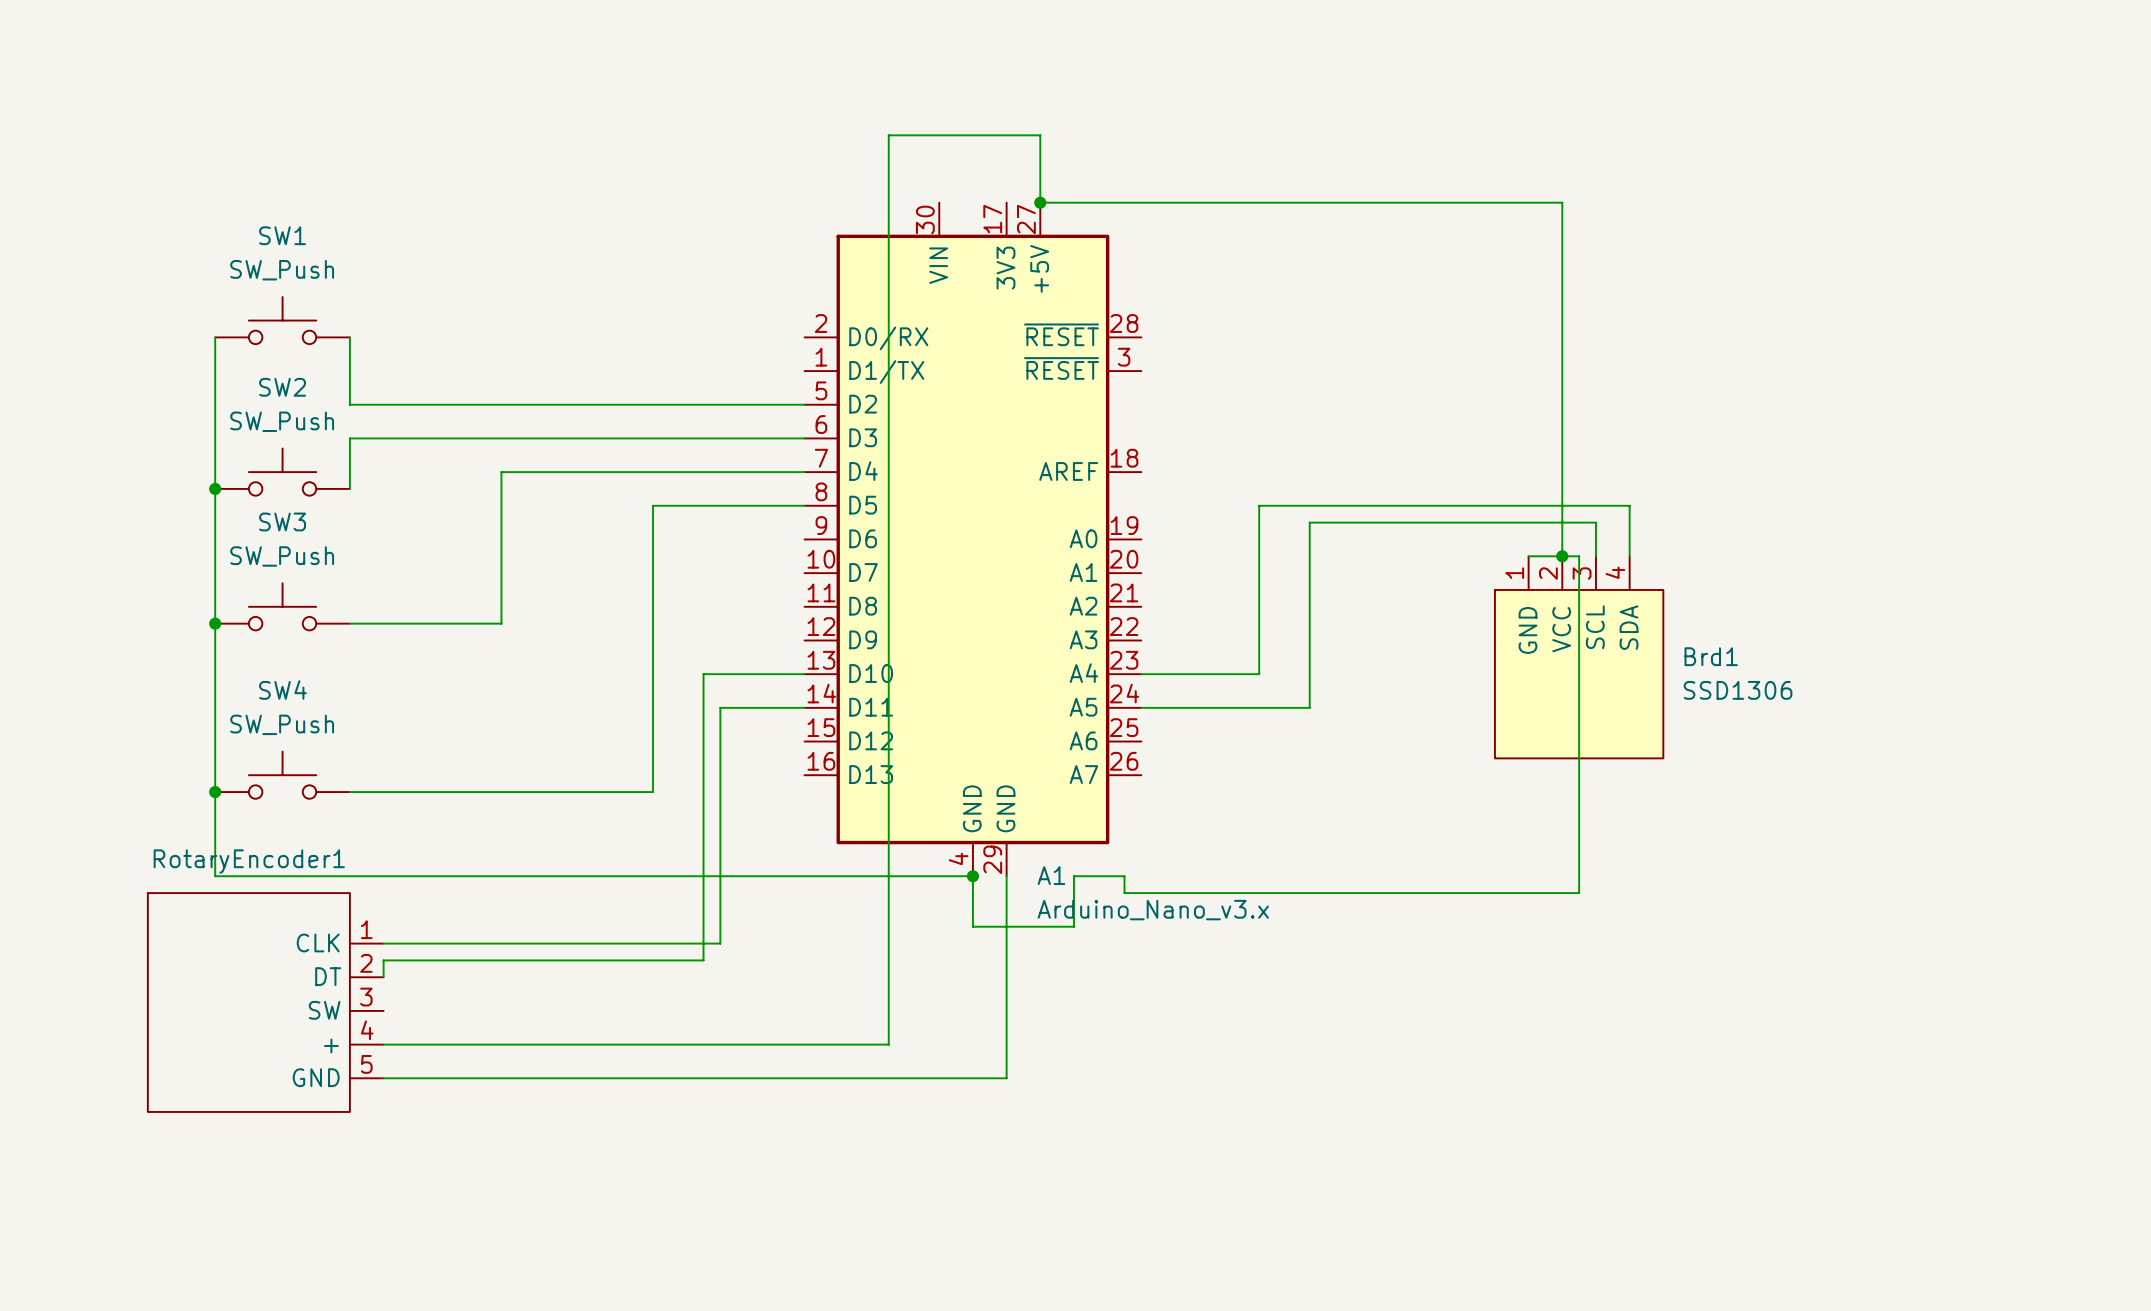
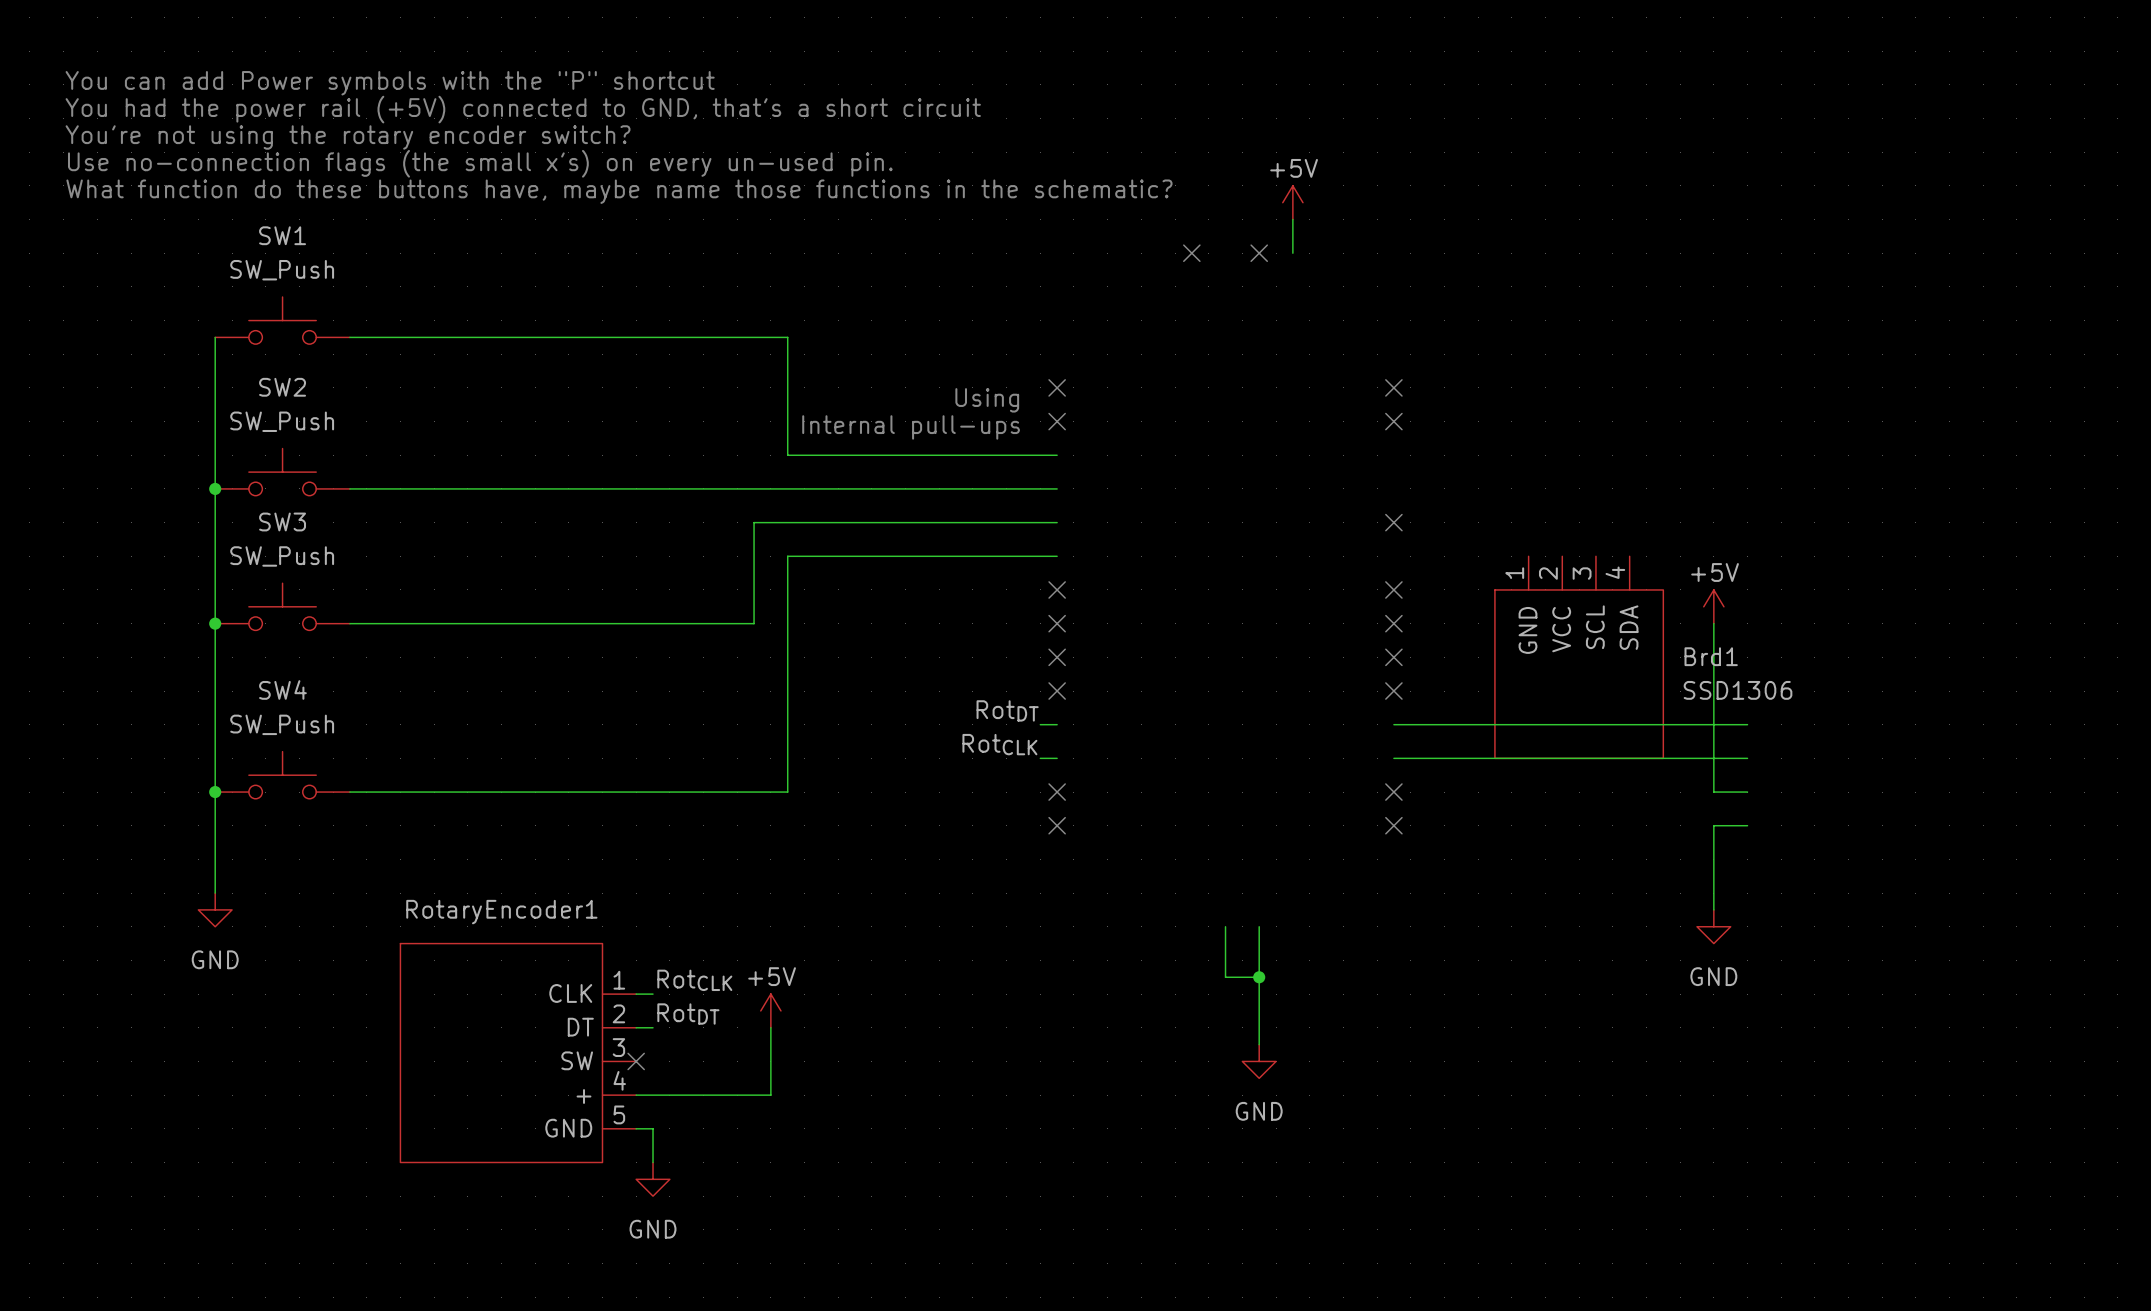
text: none -> You can add Power symbols with the "P" shortcut (390, 83)
text: none -> You had the power rail (+5V) connected to GND, that's a short circuit (523, 109)
text: none -> You're not using the rotary encoder switch? (348, 137)
text: none -> Use no-connection flags (the small x's) on every un-used pin. (480, 163)
text: none -> What function do these buttons have, maybe name those functions in the schematic? (619, 191)
junction: (1040, 202) -> none
power symbol: none -> +5V (1292, 202)
wire: none -> (1292, 219) (1292, 253)
no-connect mark: none -> (1191, 253)
no-connect mark: none -> (1259, 253)
wire: (349, 337) (349, 404) (804, 404) -> (349, 337) (787, 337) (787, 455) (1057, 455)
no-connect mark: none -> (1057, 387)
no-connect mark: none -> (1393, 387)
text: none -> Using (987, 400)
no-connect mark: none -> (1057, 421)
no-connect mark: none -> (1393, 421)
text: none -> Internal pull-ups (911, 427)
wire: (804, 438) (349, 438) (349, 488) -> (1057, 488) (349, 488)
wire: (804, 472) (501, 472) (501, 623) -> (1057, 522) (754, 522) (754, 623) (501, 623)
wire: (804, 505) (653, 505) (653, 792) -> (1057, 556) (787, 556) (787, 792) (653, 792)
no-connect mark: none -> (1393, 522)
A1: Arduino_Nano_v3.x (972, 539) -> none
wire: (1528, 556) (1579, 556) (1579, 893) (1124, 893) (1124, 876) (1073, 876) (1073, 926) (972, 926) (972, 876) (215, 876) -> (215, 893) (215, 876)
wire: (1562, 556) (1562, 202) (1040, 202) (1040, 135) (888, 135) (888, 1044) (383, 1044) -> none
junction: (1562, 556) -> none
wire: (1595, 556) (1595, 522) (1309, 522) (1309, 707) (1141, 707) -> none
wire: (1629, 556) (1629, 505) (1259, 505) (1259, 674) (1141, 674) -> none
no-connect mark: none -> (1057, 589)
no-connect mark: none -> (1393, 589)
power symbol: none -> +5V (1713, 606)
no-connect mark: none -> (1057, 623)
no-connect mark: none -> (1393, 623)
wire: none -> (1713, 623) (1713, 792) (1747, 792)
no-connect mark: none -> (1057, 657)
no-connect mark: none -> (1393, 657)
wire: (804, 674) (703, 674) (703, 960) (383, 960) (383, 977) -> none
no-connect mark: none -> (1057, 691)
no-connect mark: none -> (1393, 691)
wire: (804, 707) (720, 707) (720, 943) (383, 943) -> none
label: none -> RotDT (1007, 710)
wire: none -> (1393, 724) (1747, 724)
label: none -> RotCLK (999, 744)
wire: none -> (1393, 758) (1747, 758)
no-connect mark: none -> (1057, 792)
no-connect mark: none -> (1393, 792)
no-connect mark: none -> (1057, 825)
no-connect mark: none -> (1393, 825)
wire: none -> (1747, 825) (1713, 825) (1713, 909)
junction: (972, 876) -> none
wire: (1006, 876) (1006, 1078) (383, 1078) -> none
power symbol: none -> GND (215, 909)
wire: none -> (1225, 926) (1225, 977) (1259, 977)
wire: none -> (1259, 926) (1259, 1044)
power symbol: none -> GND (1713, 926)
junction: none -> (1259, 977)
label: none -> RotCLK (694, 980)
wire: none -> (636, 994) (653, 994)
RotaryEncoder1 position: (265, 1002) -> (518, 1053)
power symbol: none -> +5V (770, 1010)
label: none -> RotDT (688, 1014)
wire: none -> (636, 1027) (653, 1027)
wire: none -> (770, 1027) (770, 1095) (636, 1095)
no-connect mark: none -> (636, 1061)
power symbol: none -> GND (1259, 1061)
wire: none -> (636, 1128) (653, 1128) (653, 1162)
power symbol: none -> GND (653, 1179)

